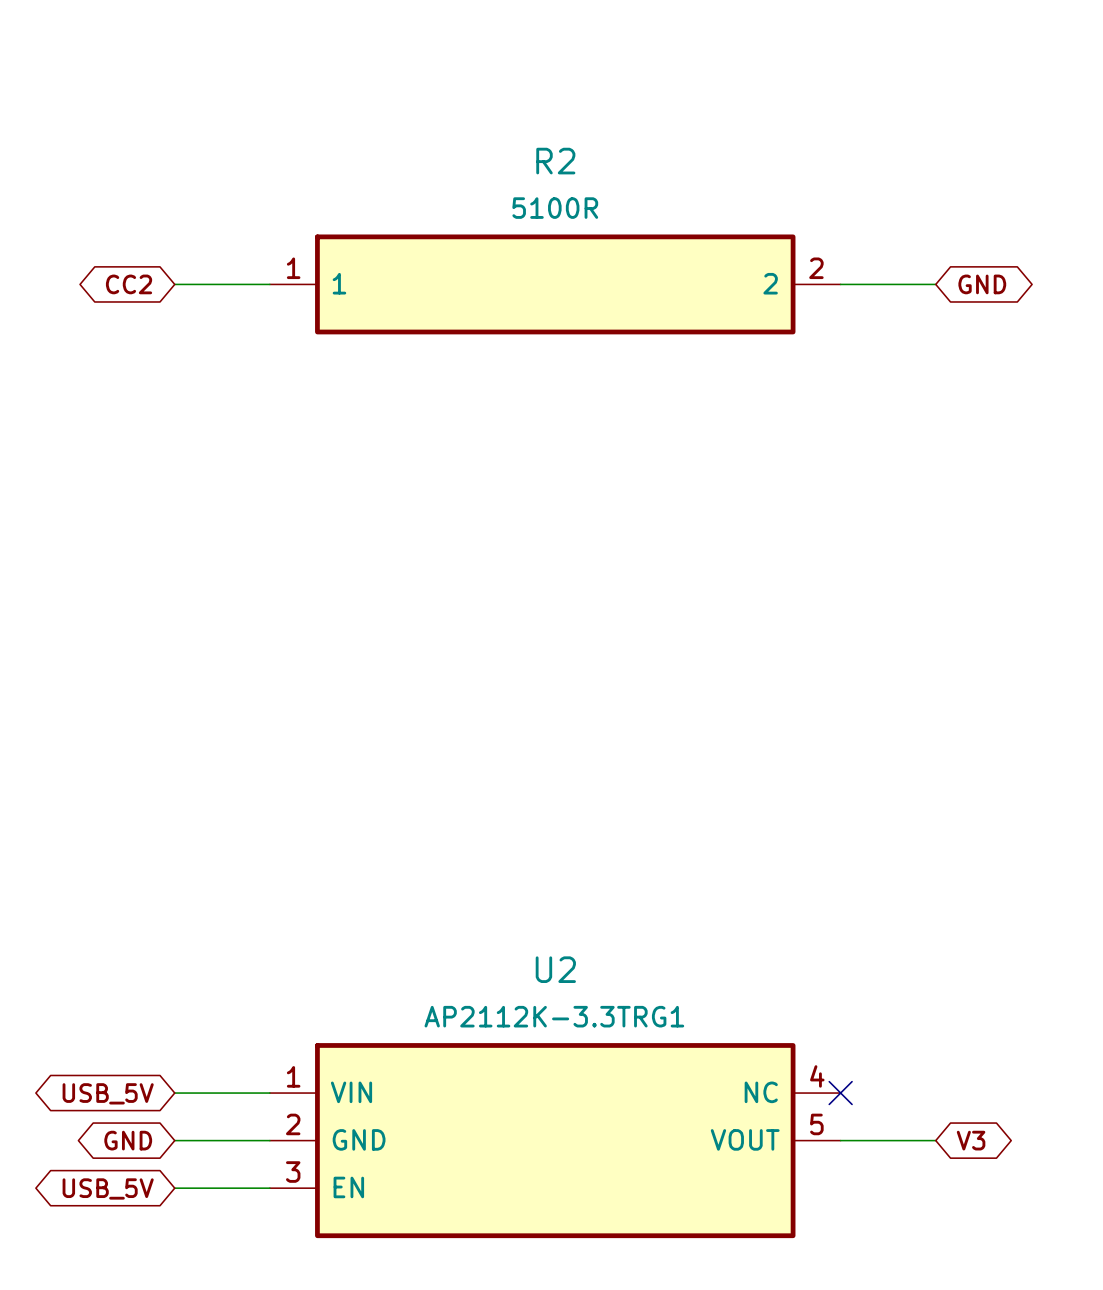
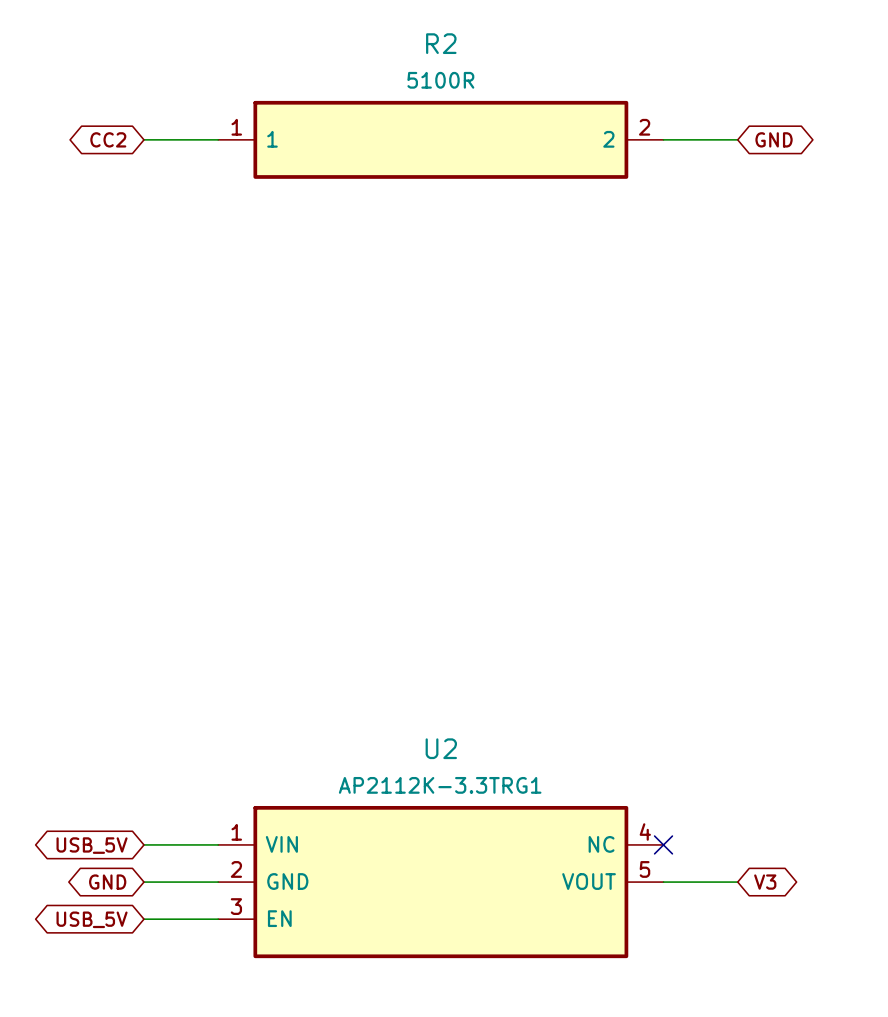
global label position: CC2 (129, 284) -> CC2 (108, 139)
wire: (174, 284) (269, 284) -> (143, 139) (218, 139)
R2 position: (555, 284) -> (440, 139)
wire: (840, 284) (935, 284) -> (663, 139) (737, 139)
global label position: GND (982, 284) -> GND (774, 139)

